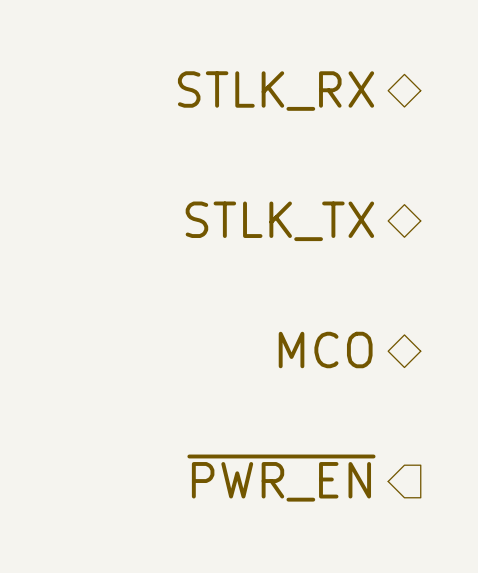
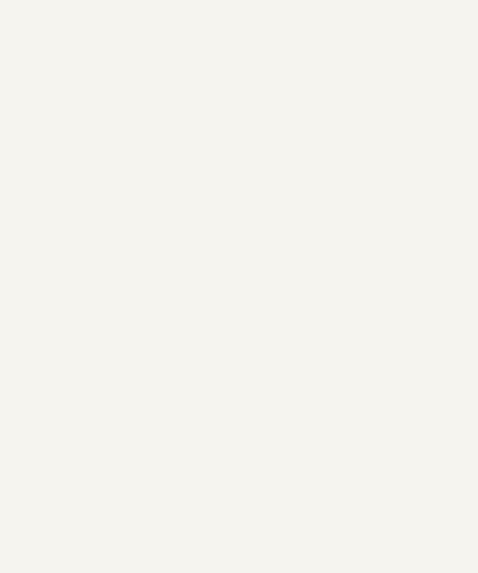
hierarchical label: STLK_RX (276, 91) -> none
hierarchical label: STLK_TX (279, 221) -> none
hierarchical label: MCO (325, 350) -> none
hierarchical label: ~{PWR_EN} (281, 478) -> none

